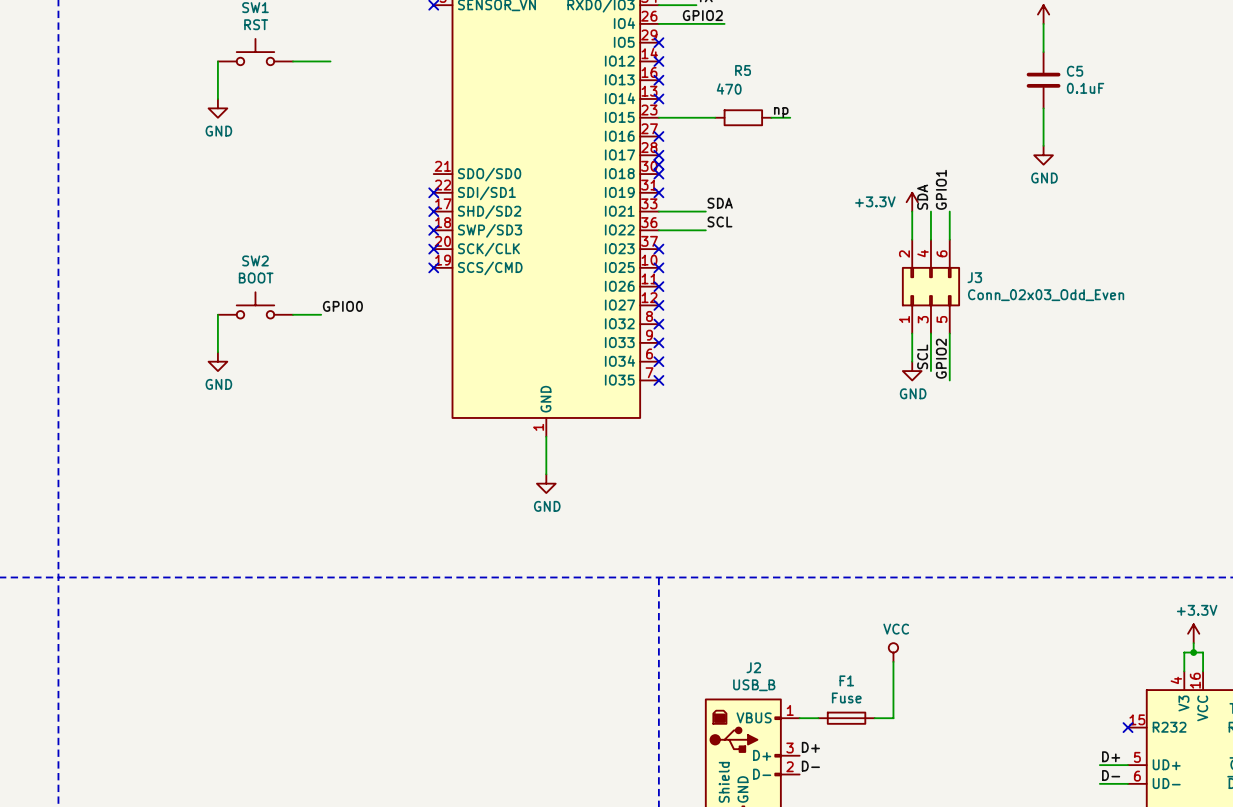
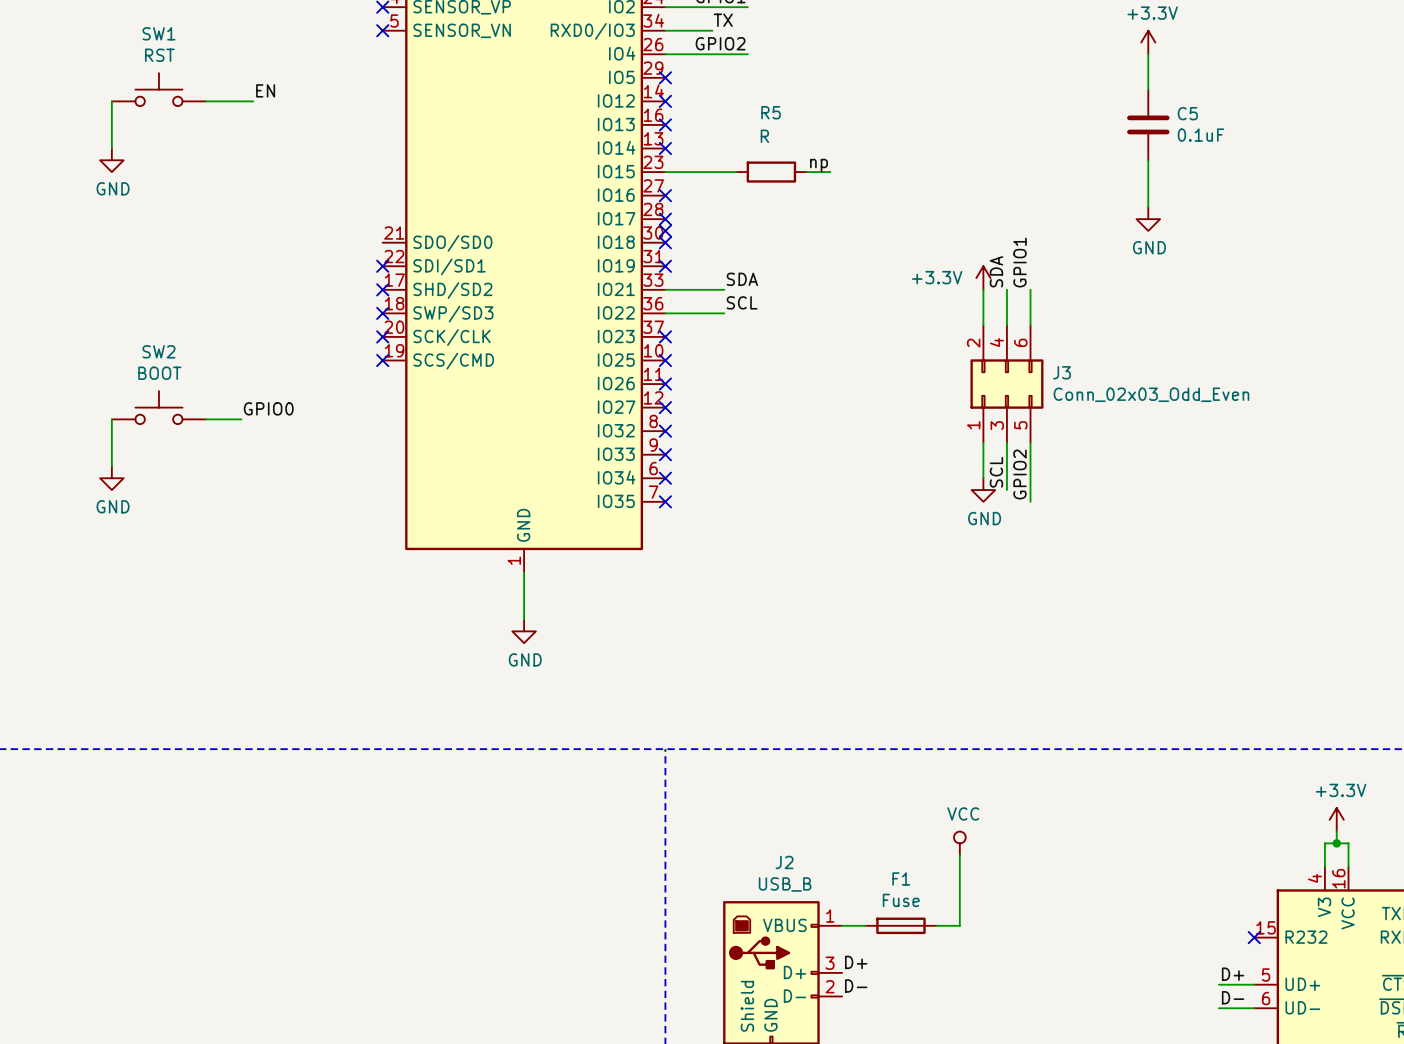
label: none -> EN (265, 90)
R5 value: 470 (729, 89) -> R (764, 136)

